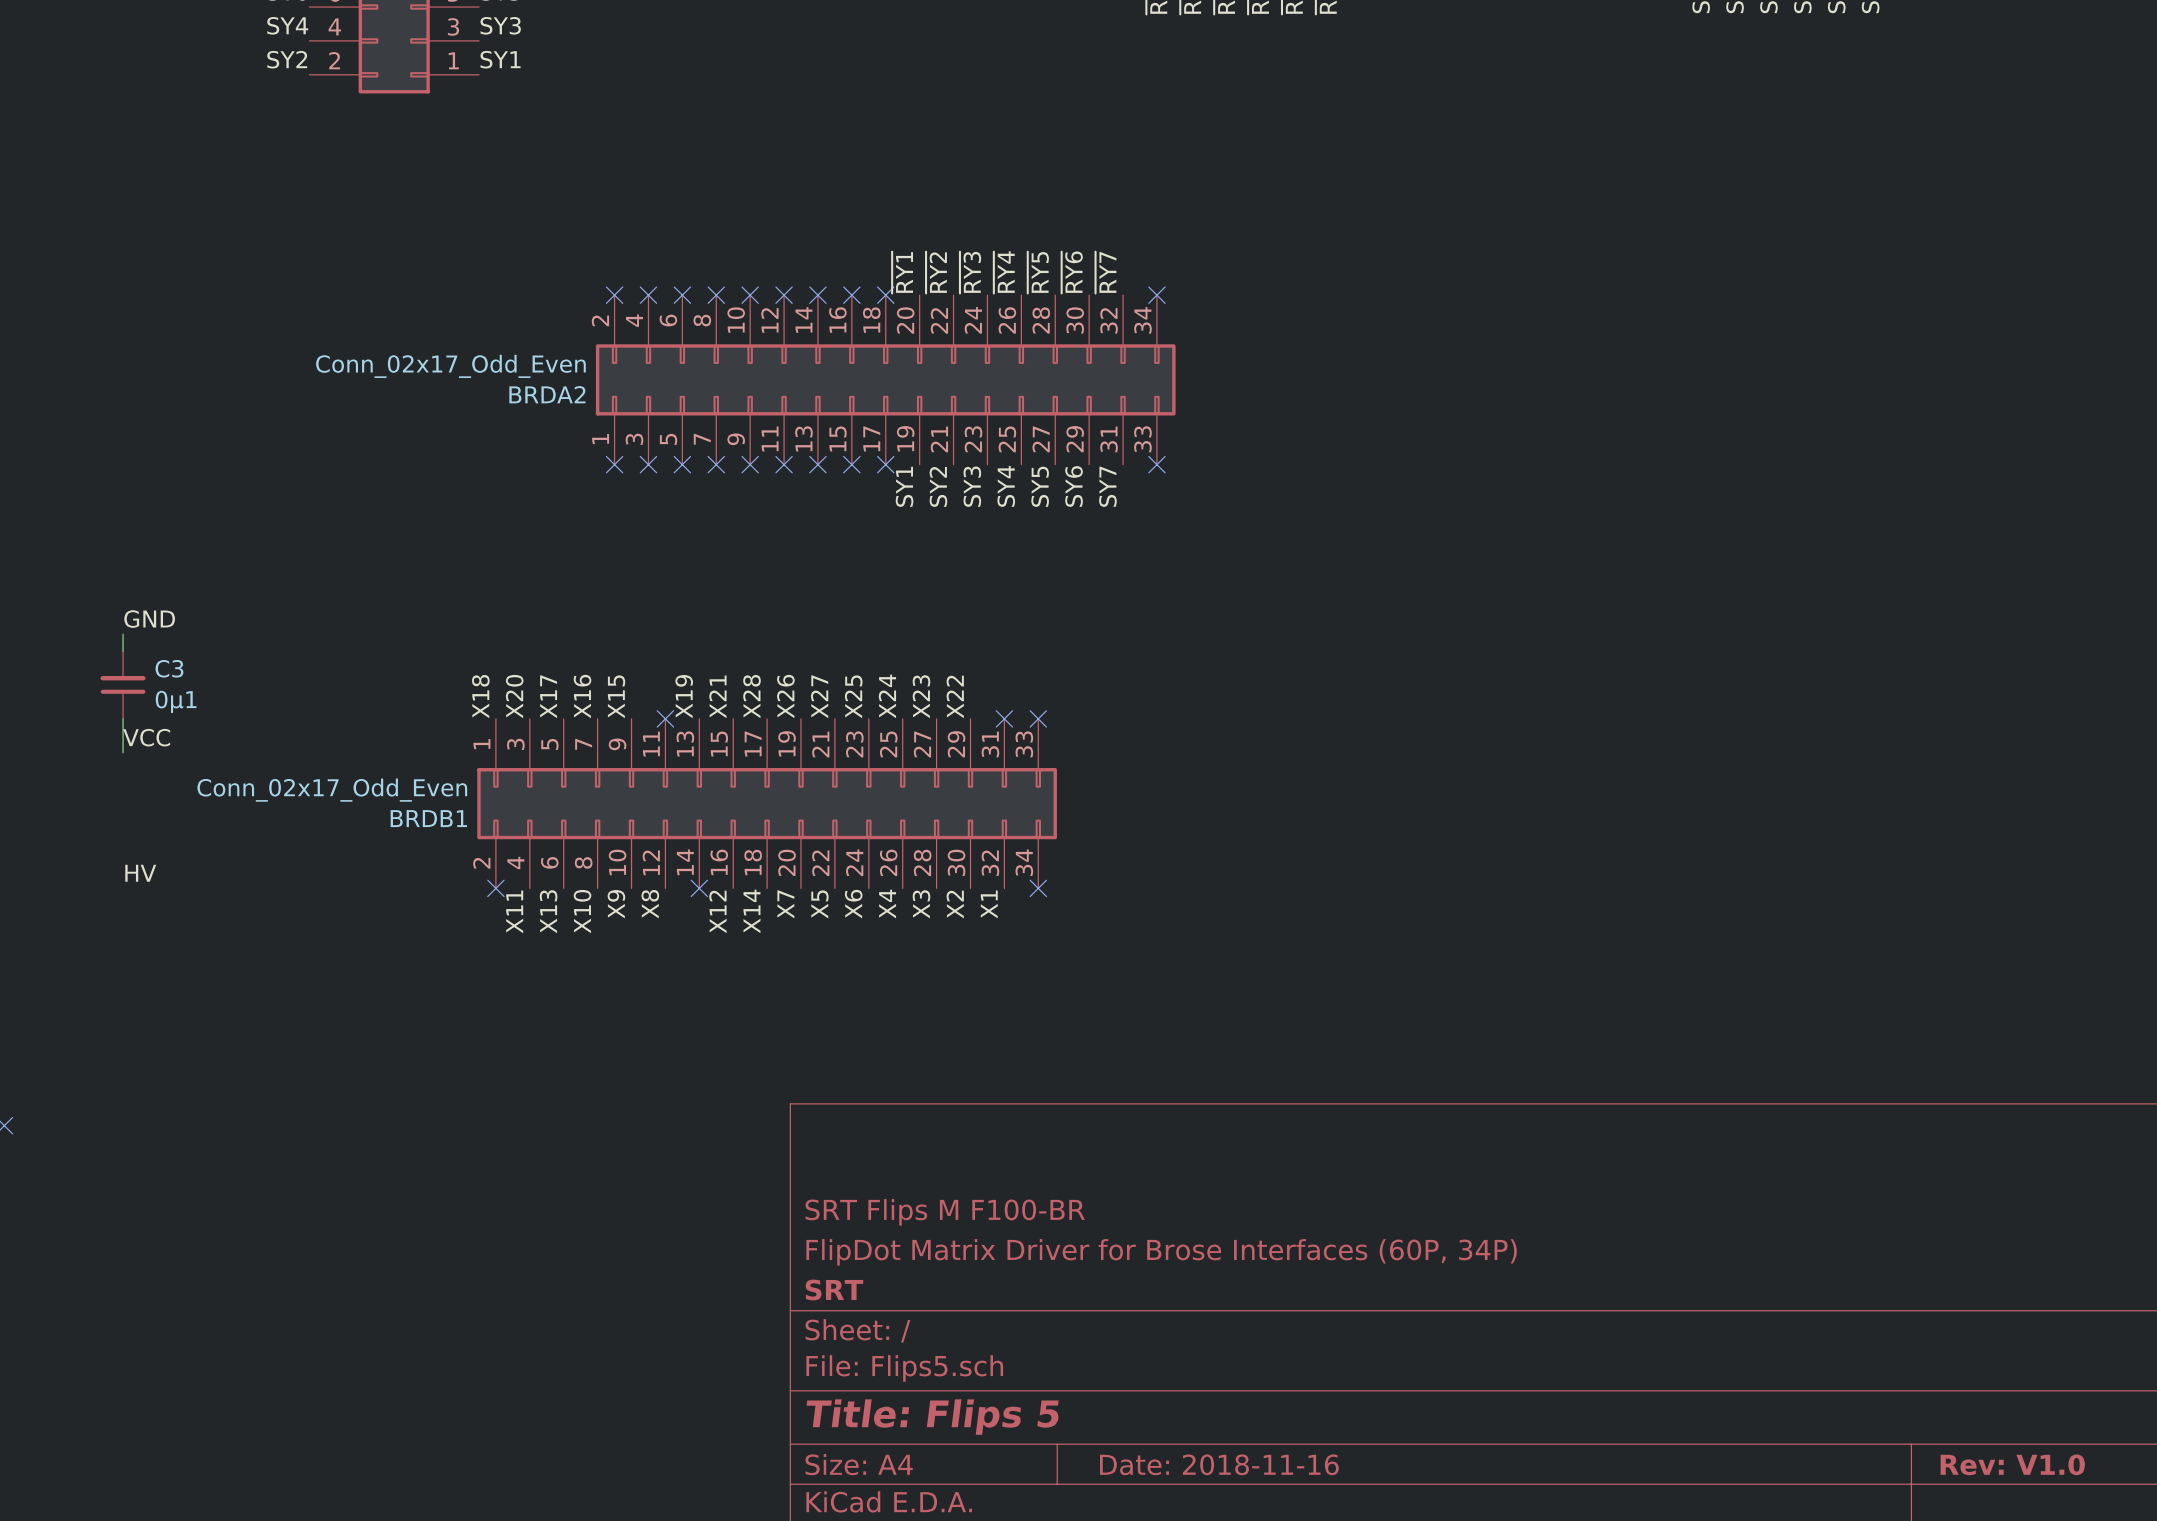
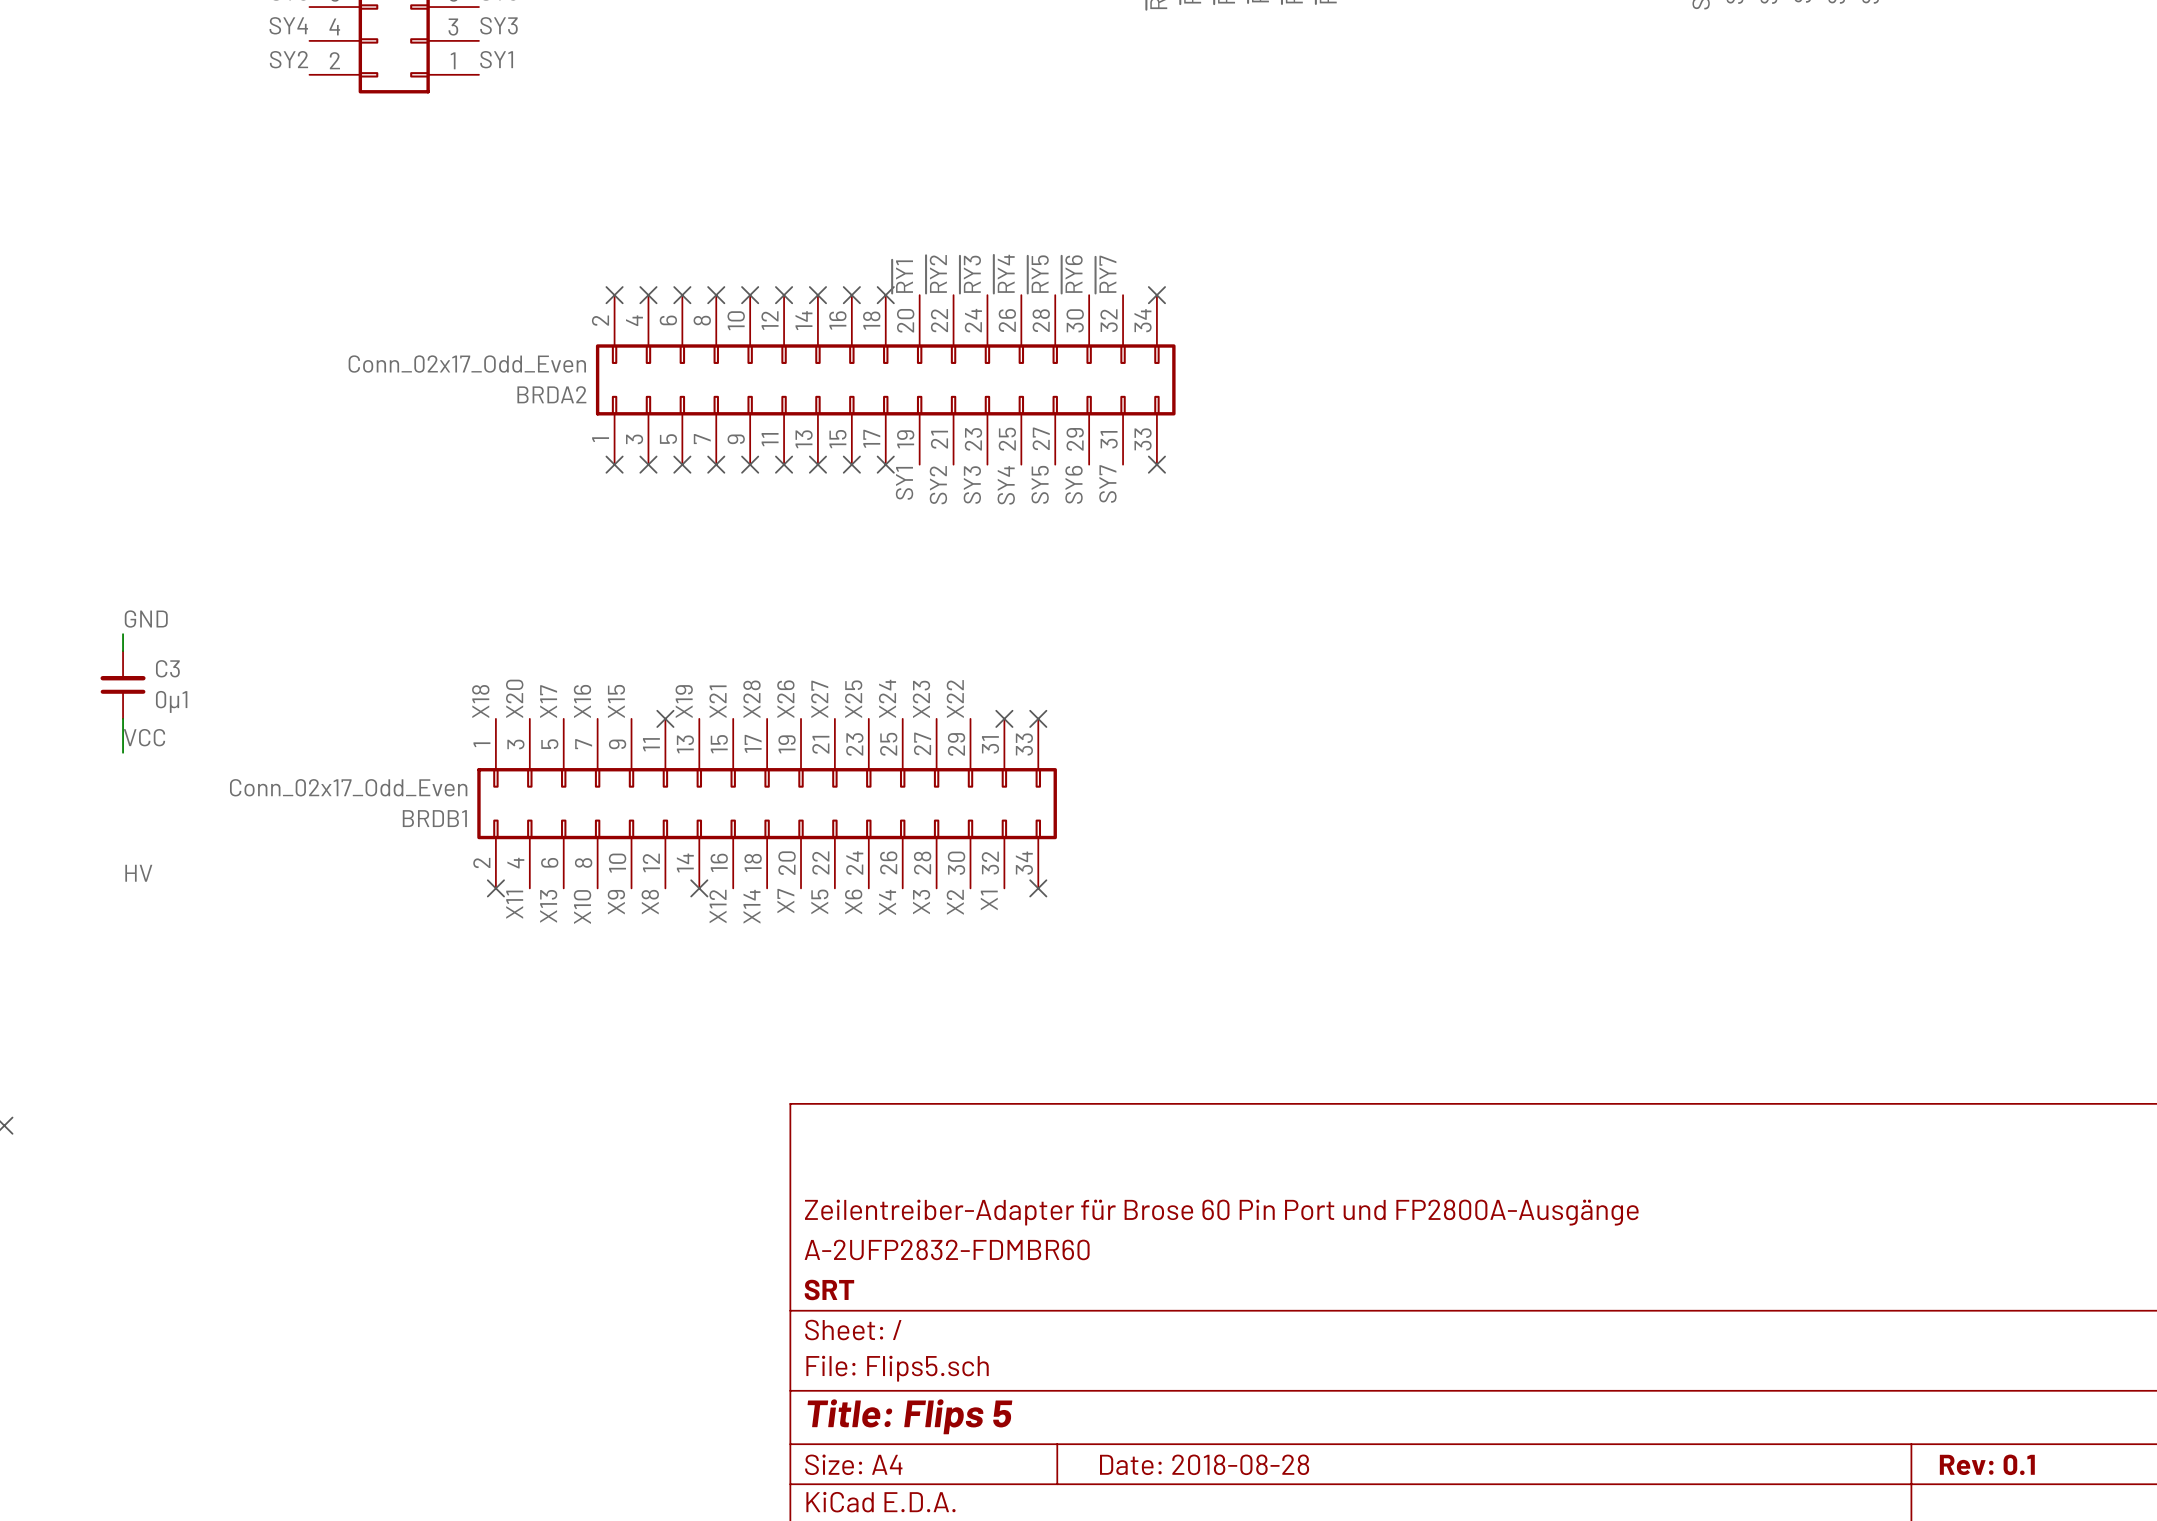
title block: SRT Flips M F100-BR (945, 1212) -> Zeilentreiber-Adapter für Brose 60 Pin Port und FP2800A-Ausgänge (1221, 1212)
title block: FlipDot Matrix Driver for Brose Interfaces (60P, 34P) (1161, 1252) -> A-2UFP2832-FDMBR60 (947, 1249)
title block: Date: 2018-11-16 (1219, 1464) -> Date: 2018-08-28 (1204, 1464)
title block: Rev: V1.0 (2012, 1464) -> Rev: 0.1 (1987, 1464)

